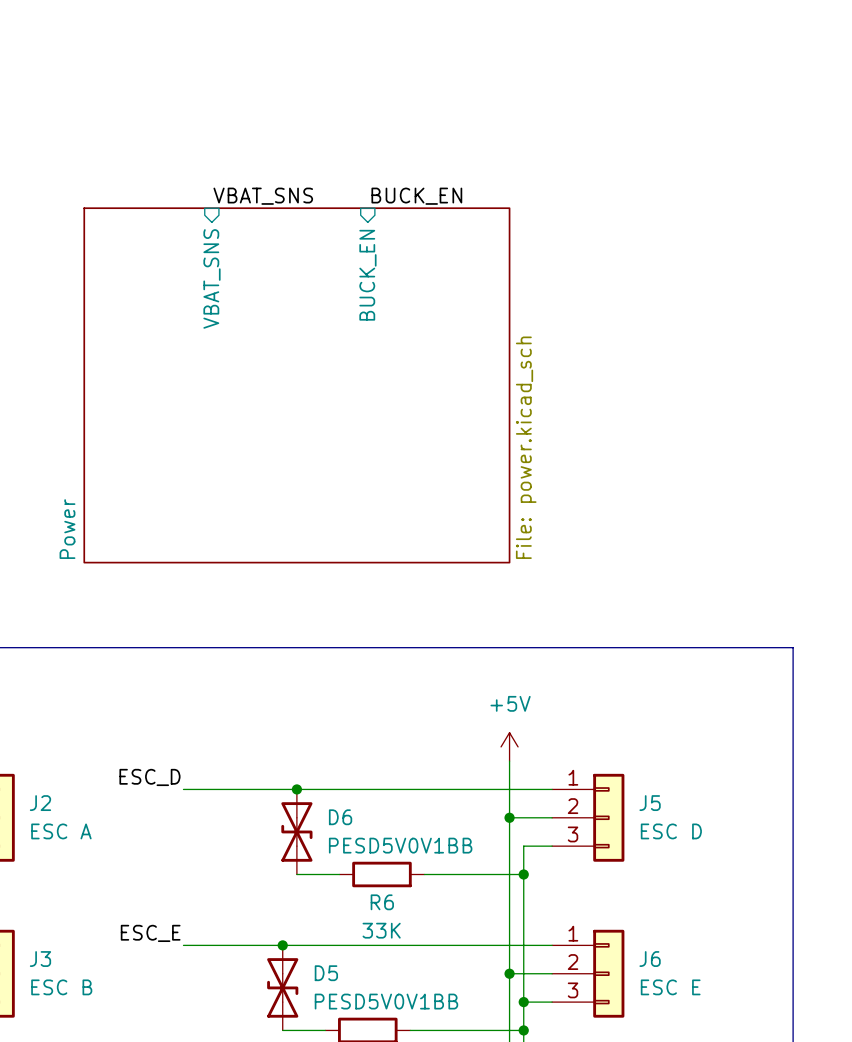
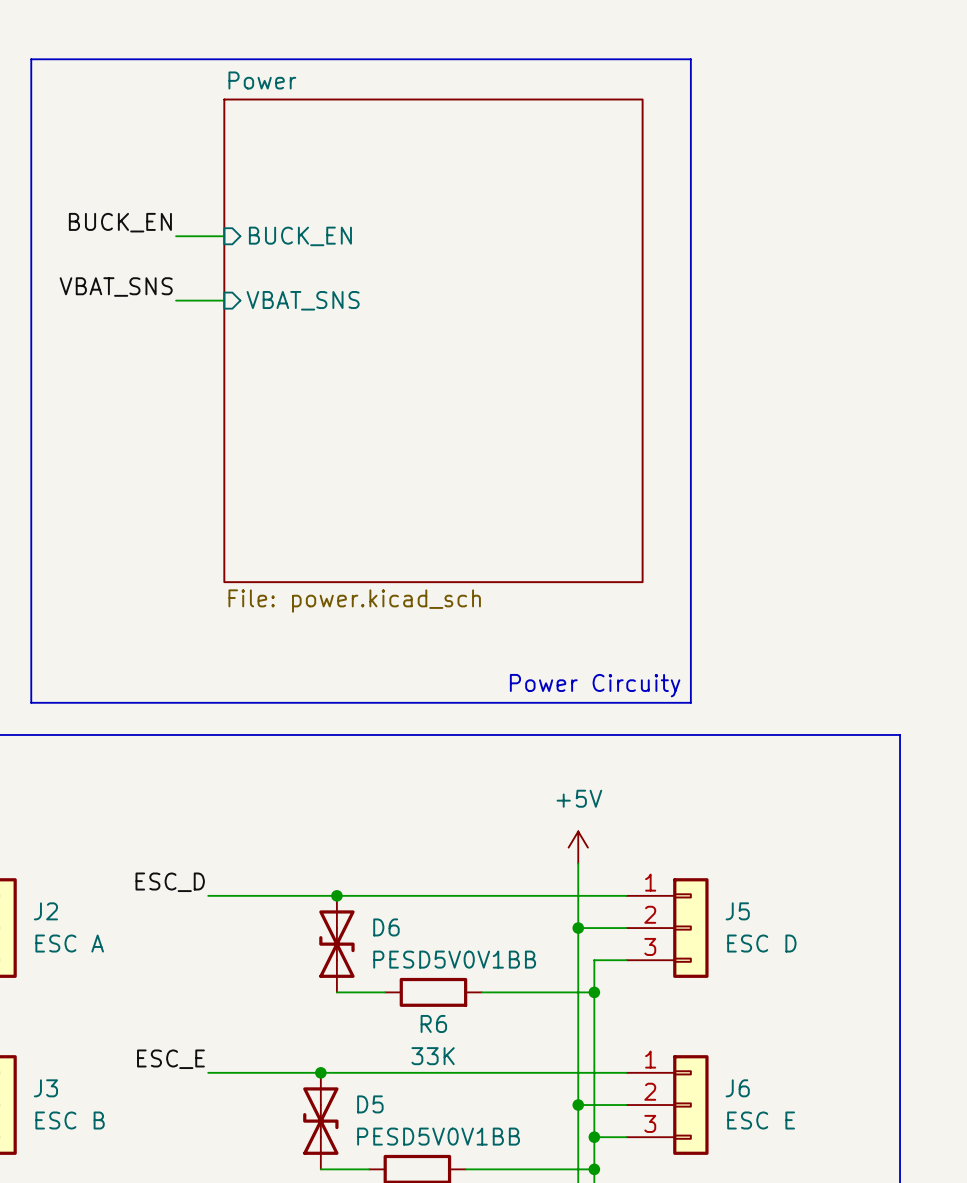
line: none -> (31, 59) (690, 59) (690, 702) (31, 702) (31, 59)
label position: VBAT_SNS (263, 196) -> VBAT_SNS (116, 287)
label position: BUCK_EN (416, 196) -> BUCK_EN (120, 222)
wire: none -> (176, 300) (224, 300)
sheet pin rotation: 0° (367, 275) -> 90° counterclockwise (300, 236)
sheet pin position: BUCK_EN (367, 275) -> BUCK_EN (300, 236)
sheet pin rotation: 0° (211, 278) -> 90° counterclockwise (303, 300)
sheet Power: none -> File: power.kicad_sch (433, 340)
sheet Power: File: power.kicad_sch (296, 385) -> none
text: none -> Power Circuity (595, 685)

